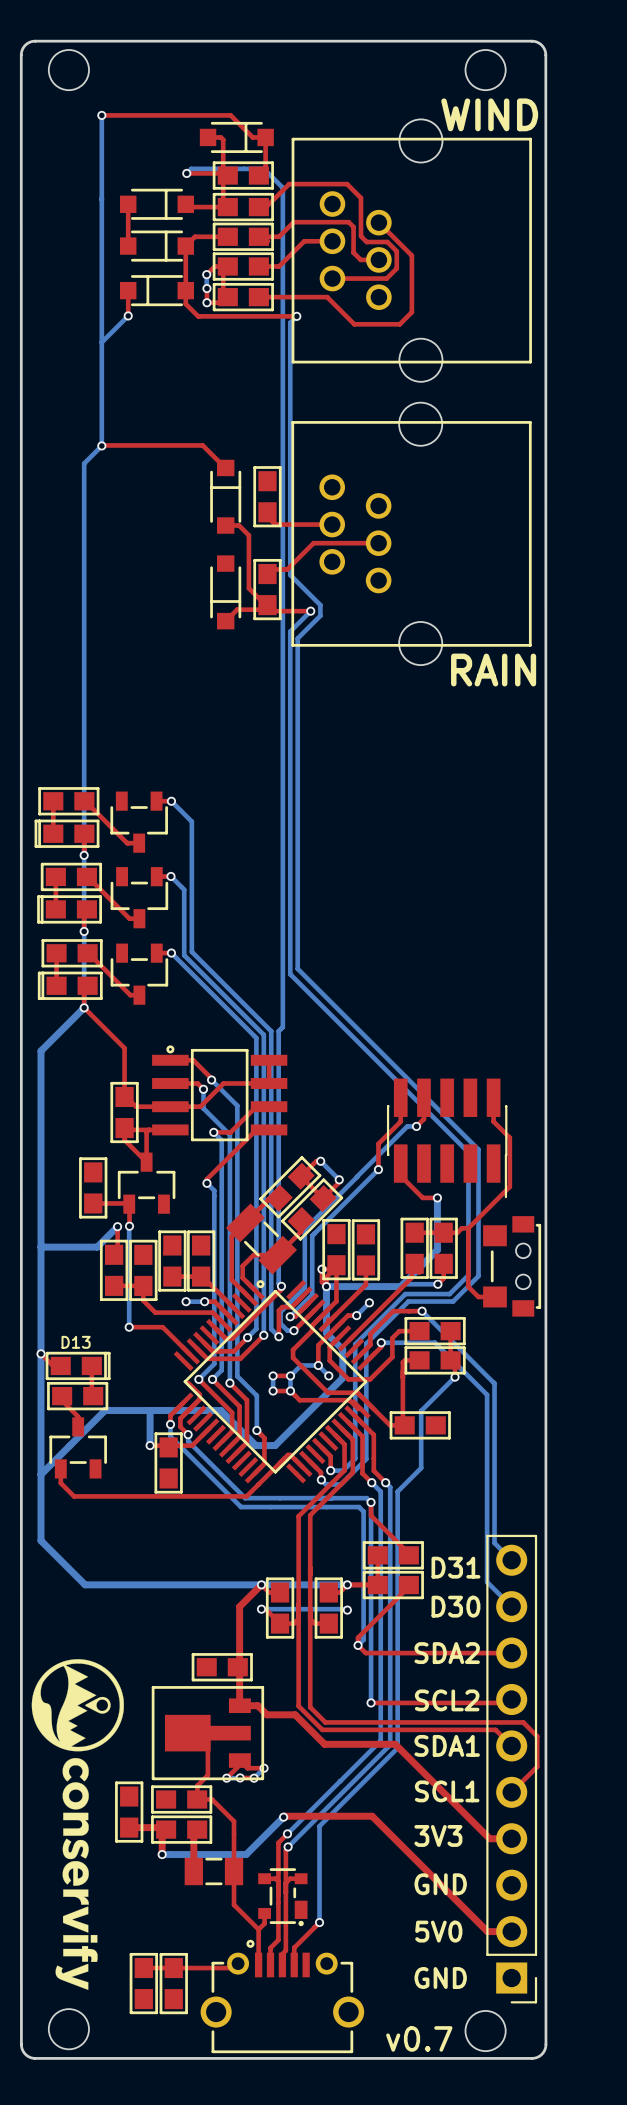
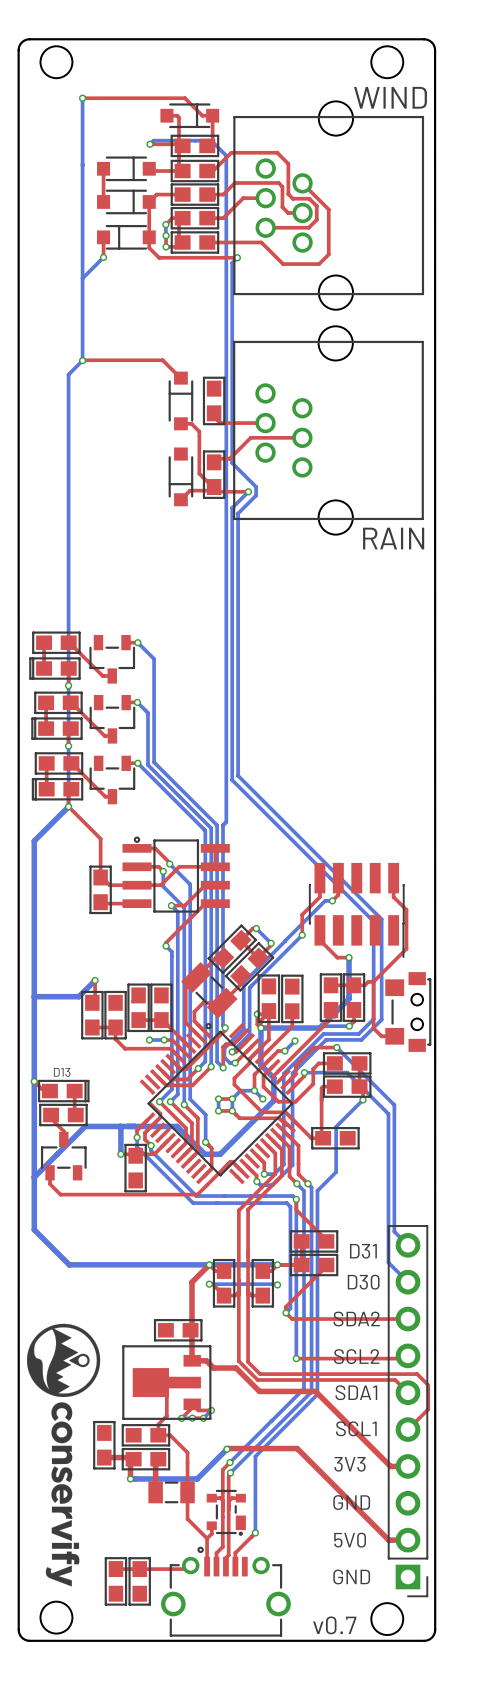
top track: (124, 1128) (124, 1140) (146, 1162) (146, 1132) (148, 1129) -> none
part: (146, 1183) -> none
part: (93, 1187) -> none
top track: (93, 1203) (128, 1203) (129, 1226) -> none
bottom track: (129, 1226) (129, 1327) -> none
via: (129, 1226) -> none
top track: (129, 1327) (162, 1327) (190, 1354) -> none
via: (129, 1327) -> none

